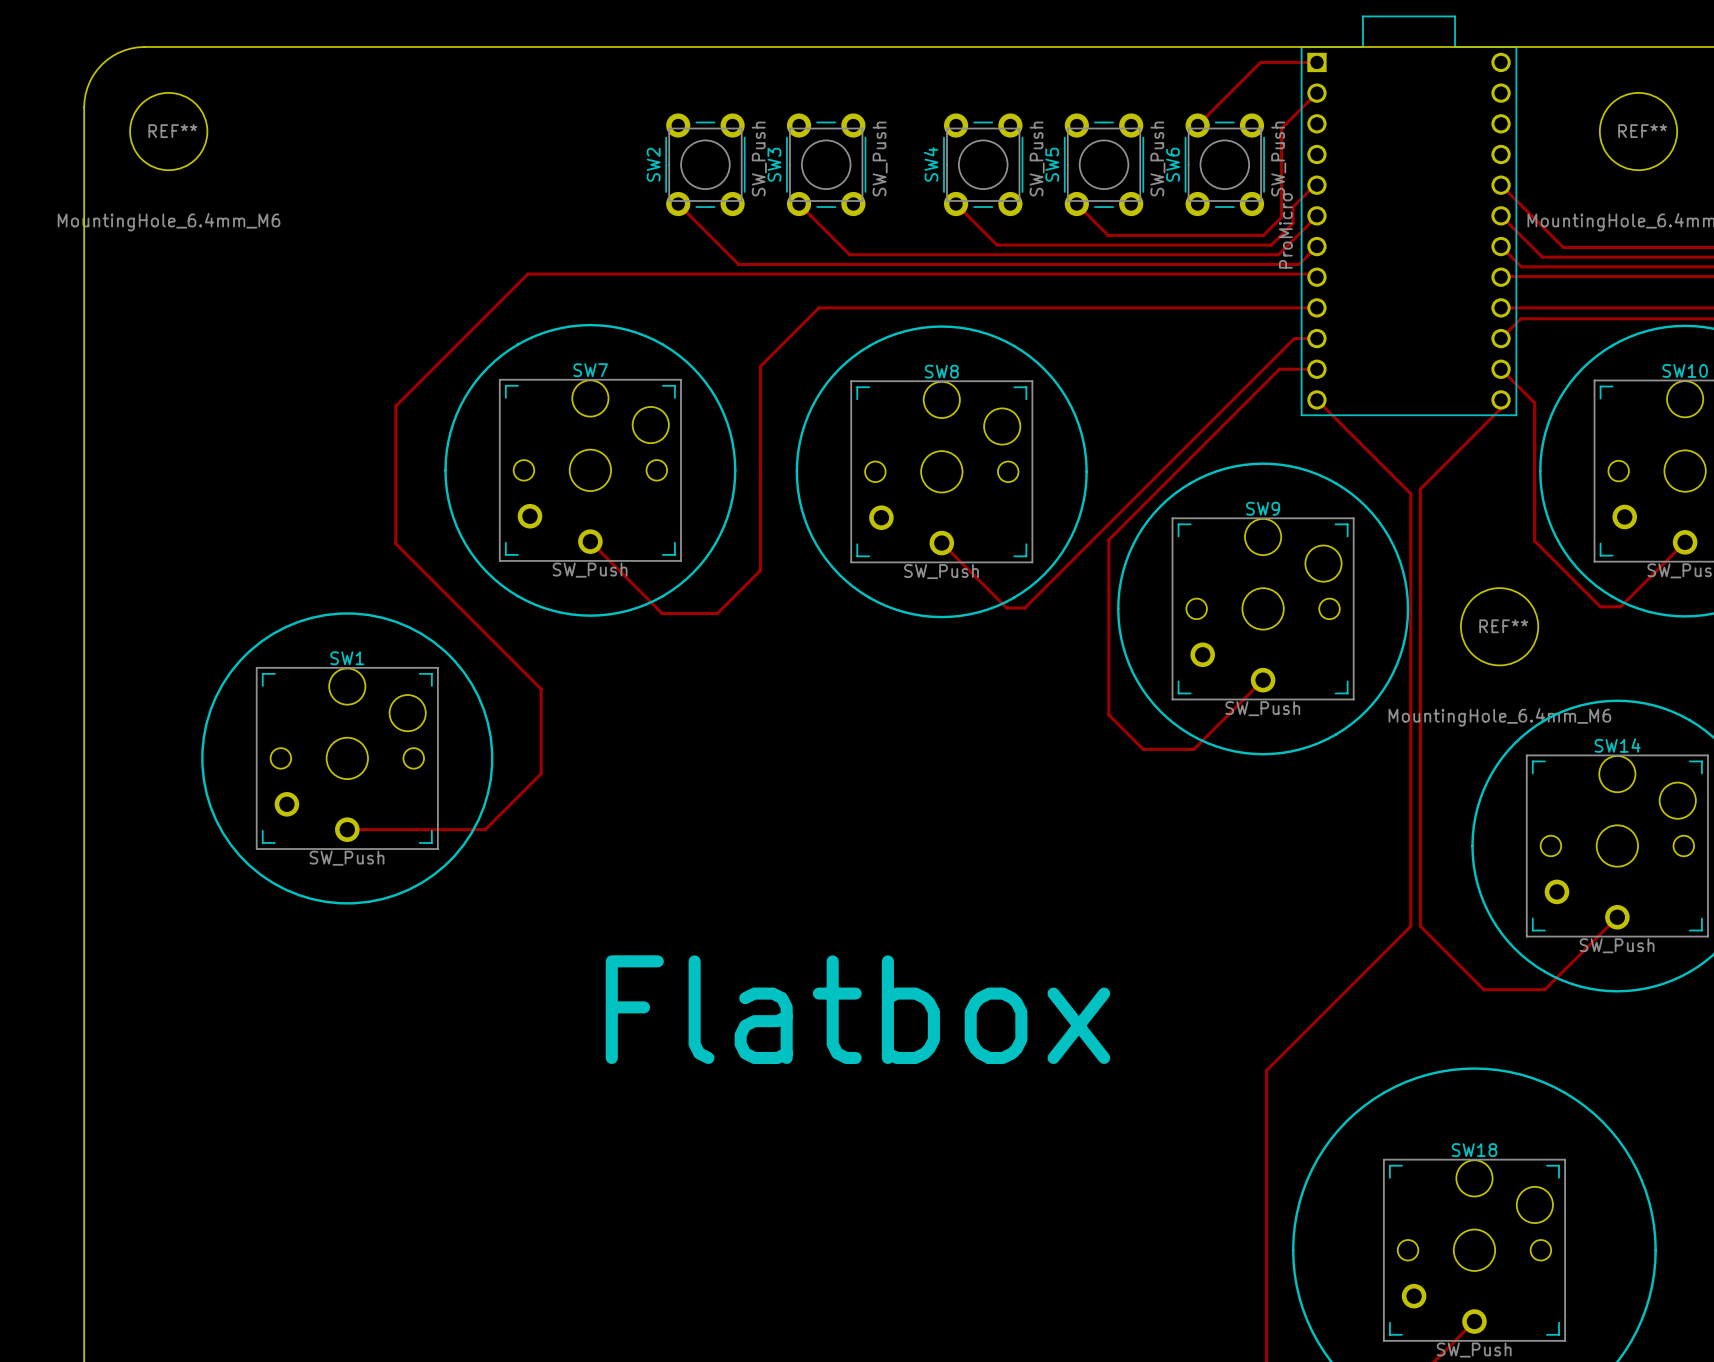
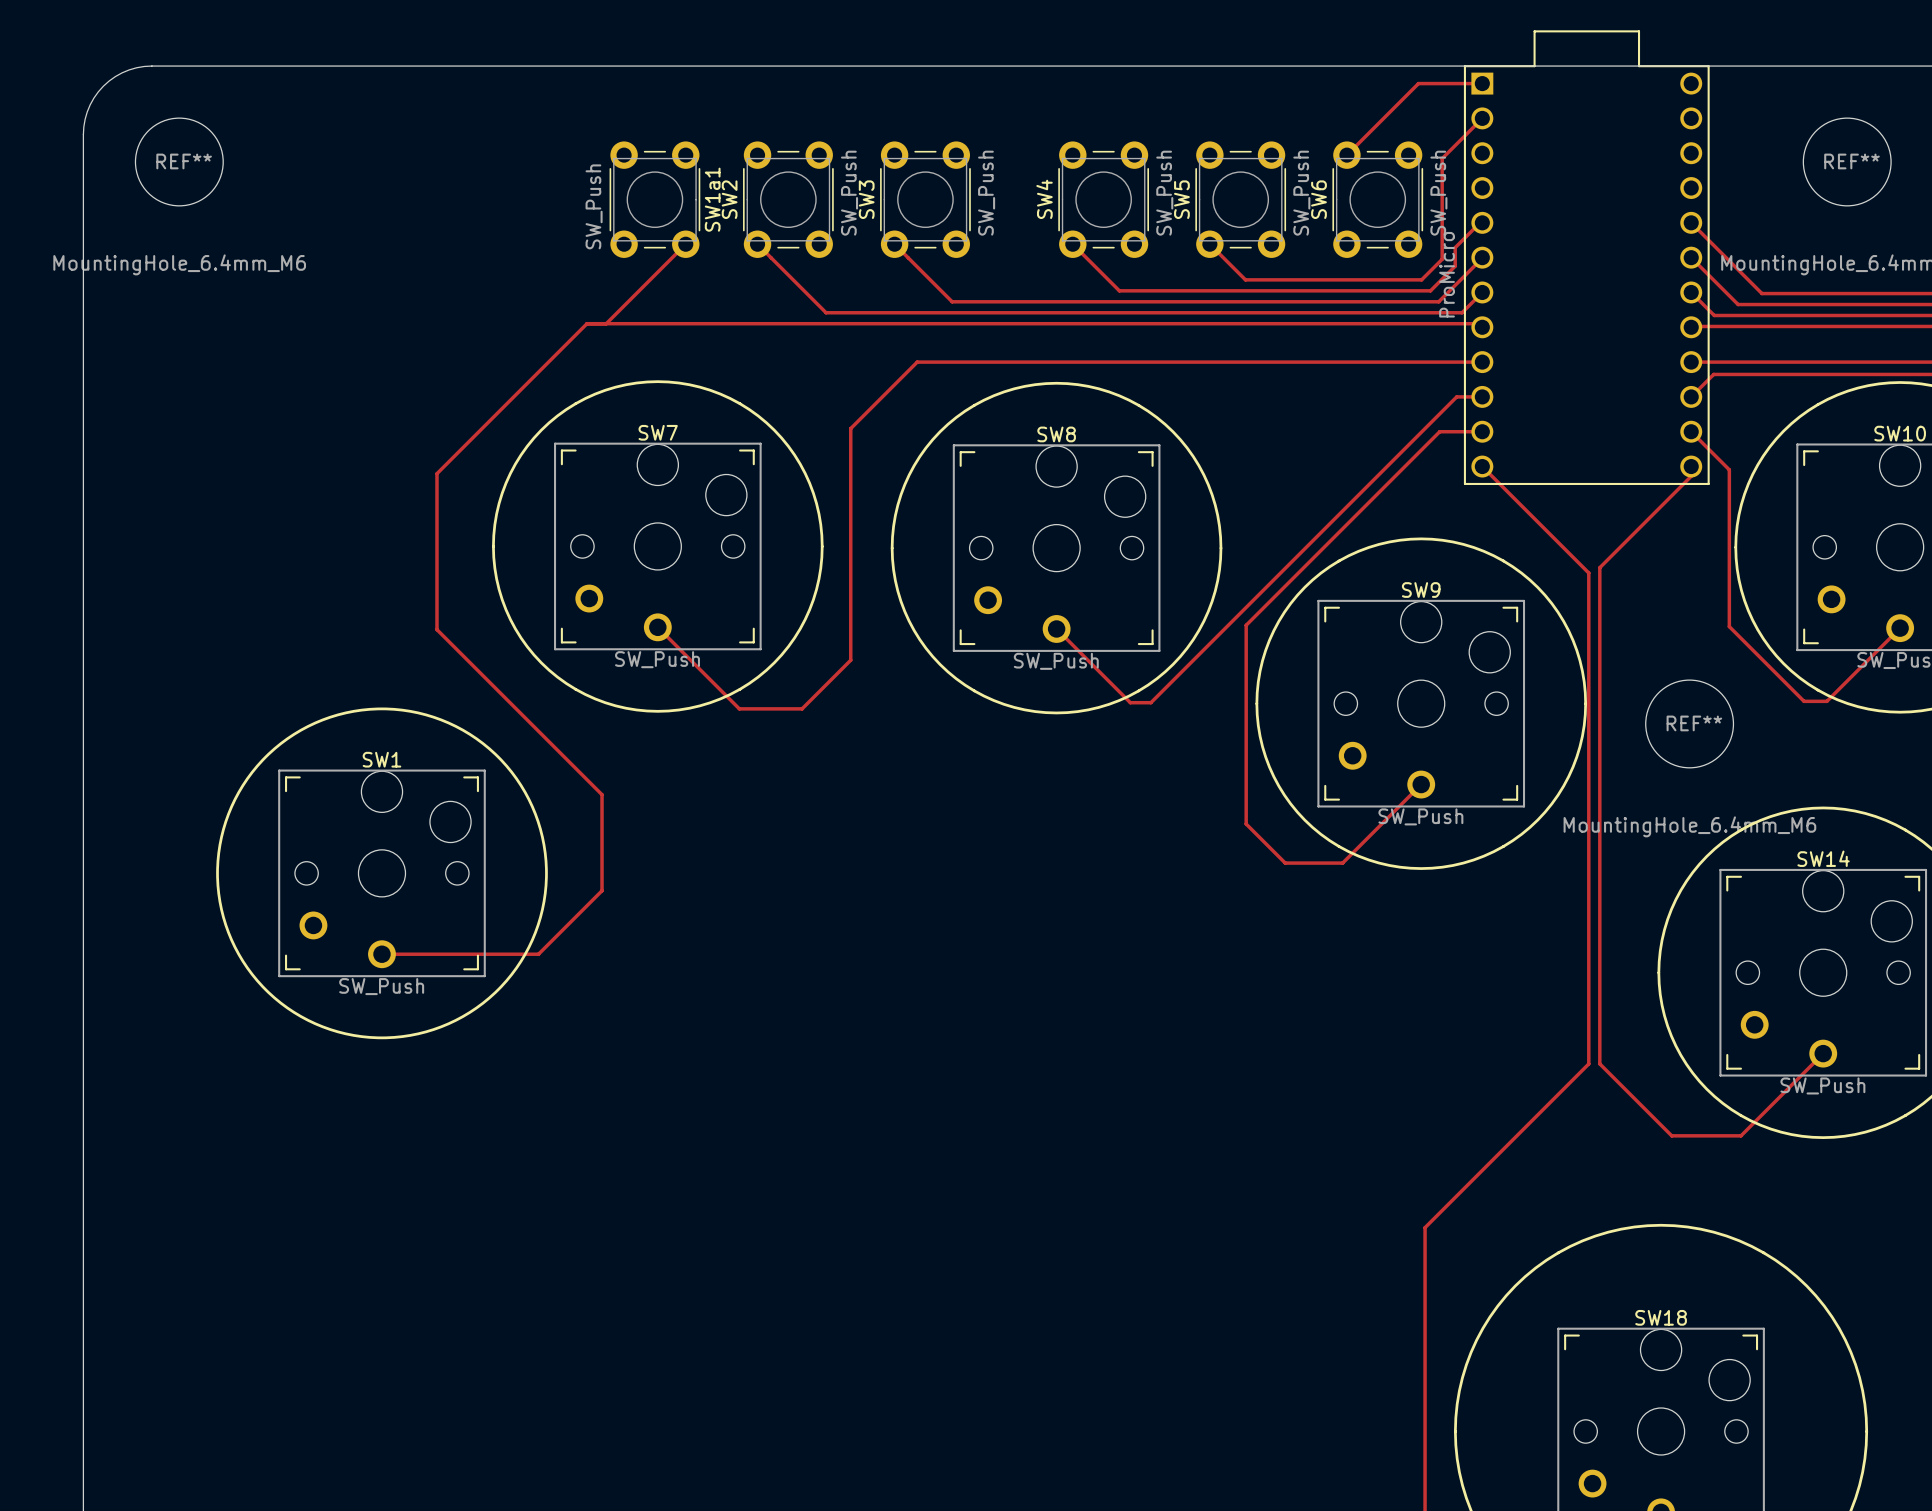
SW1a1: none -> SW_Push (654, 199)
track: none -> (685, 244) (606, 323)
text: Flatbox (857, 1009) -> none

